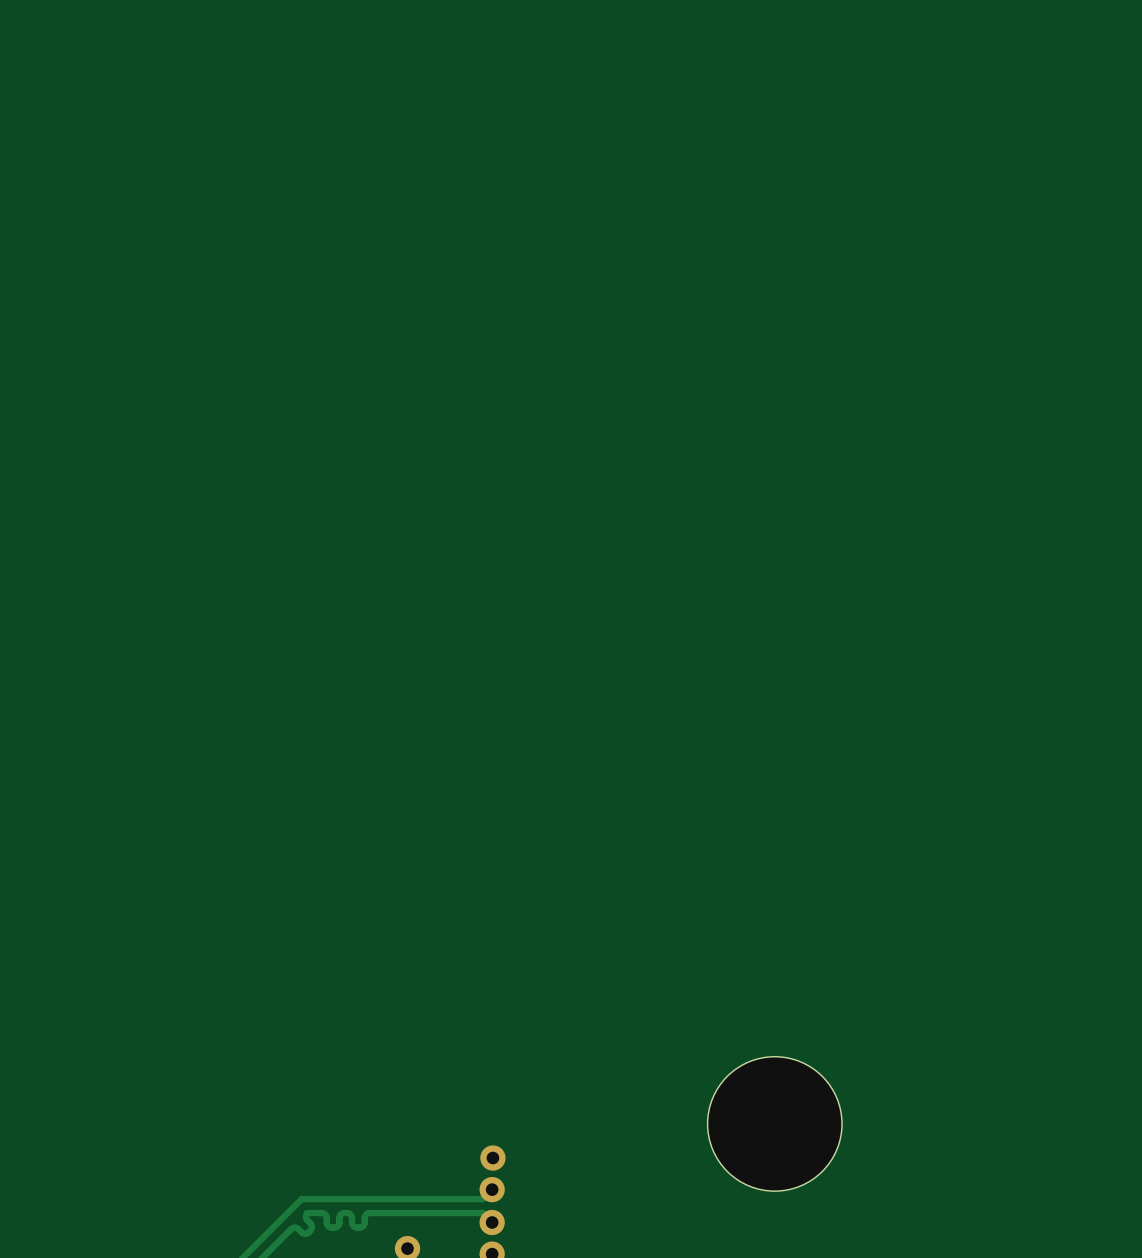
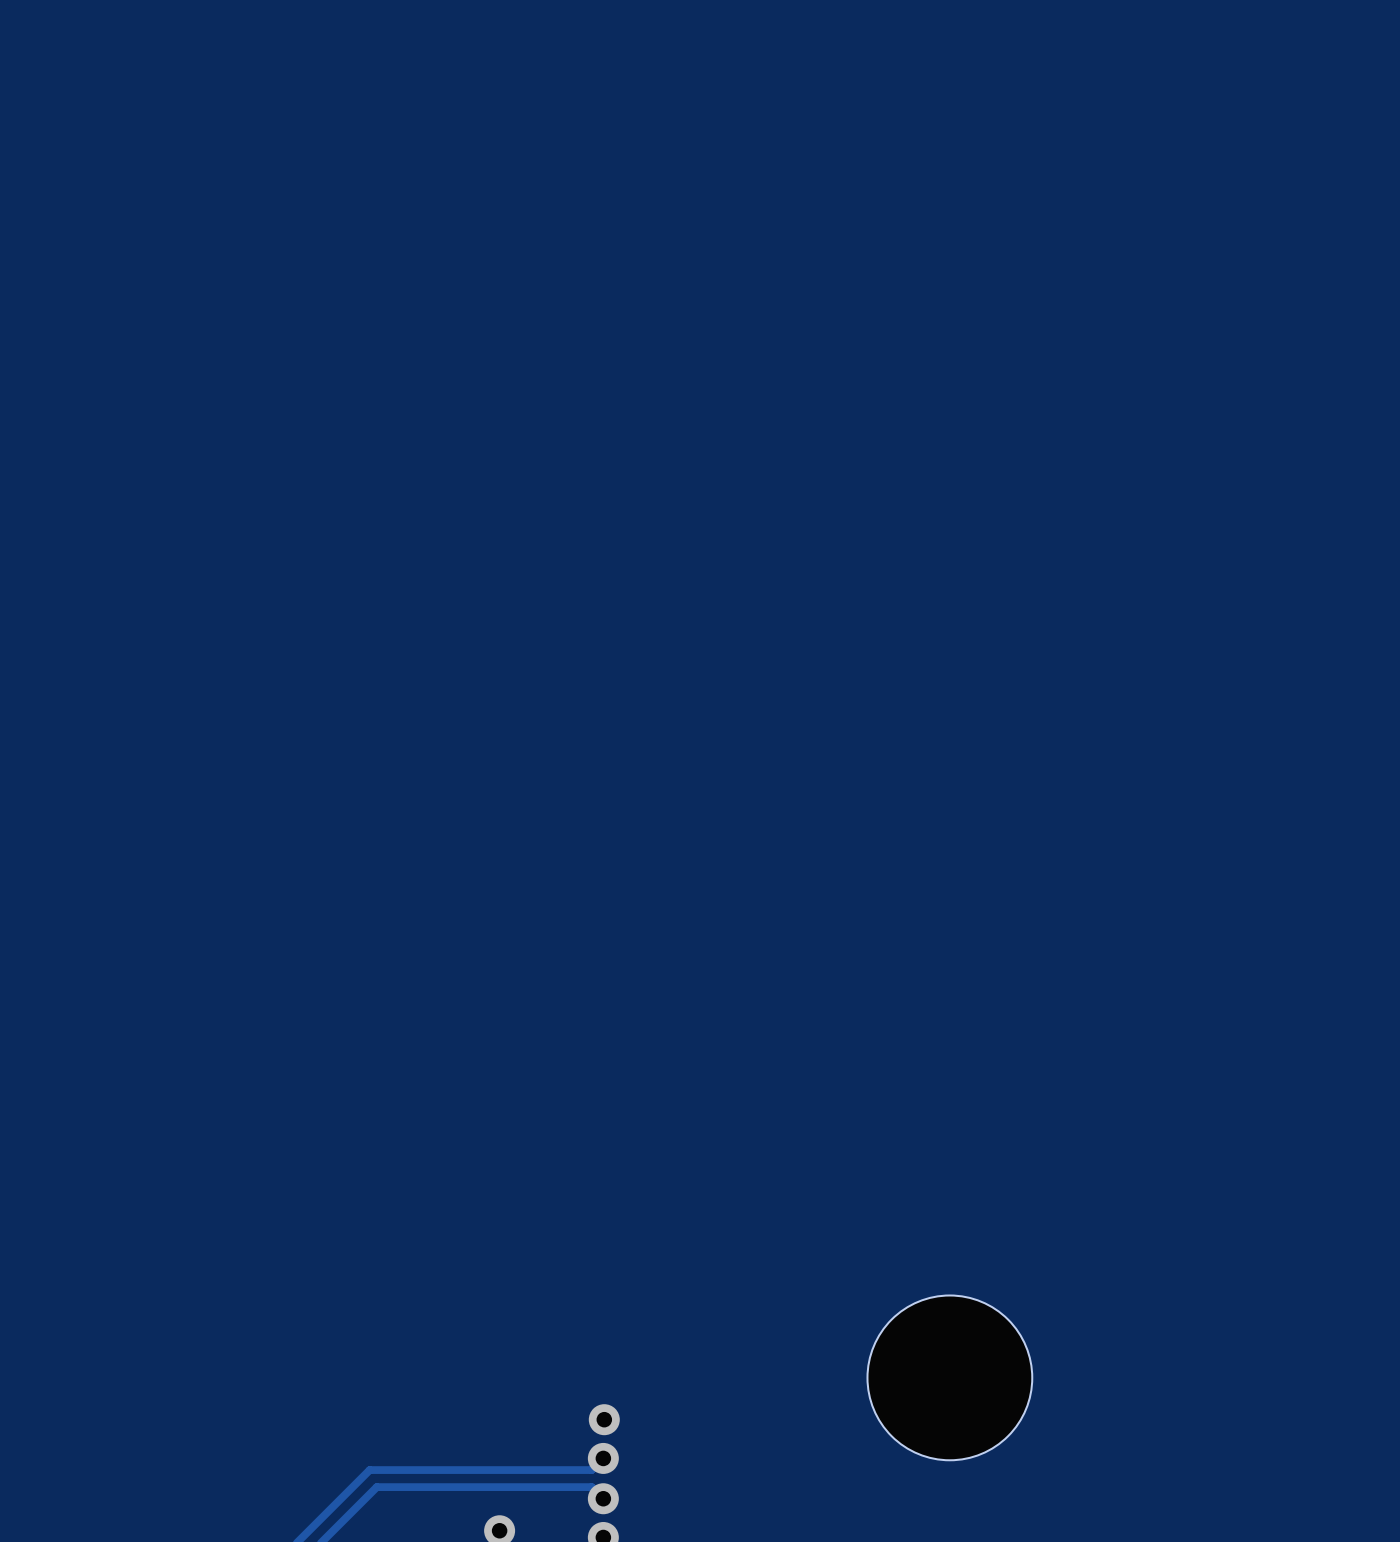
track: (307, 1213) (306, 1218) (311, 1225) (310, 1230) (304, 1233) (296, 1227) (291, 1229) -> (376, 1487) (357, 1506)
track: (344, 1213) (339, 1216) (338, 1225) (334, 1227) (327, 1225) (326, 1216) (321, 1213) -> (422, 1487) (394, 1487)
track: (369, 1213) (365, 1216) (363, 1225) (359, 1227) (353, 1225) (351, 1216) (347, 1213) -> (453, 1487) (425, 1487)

